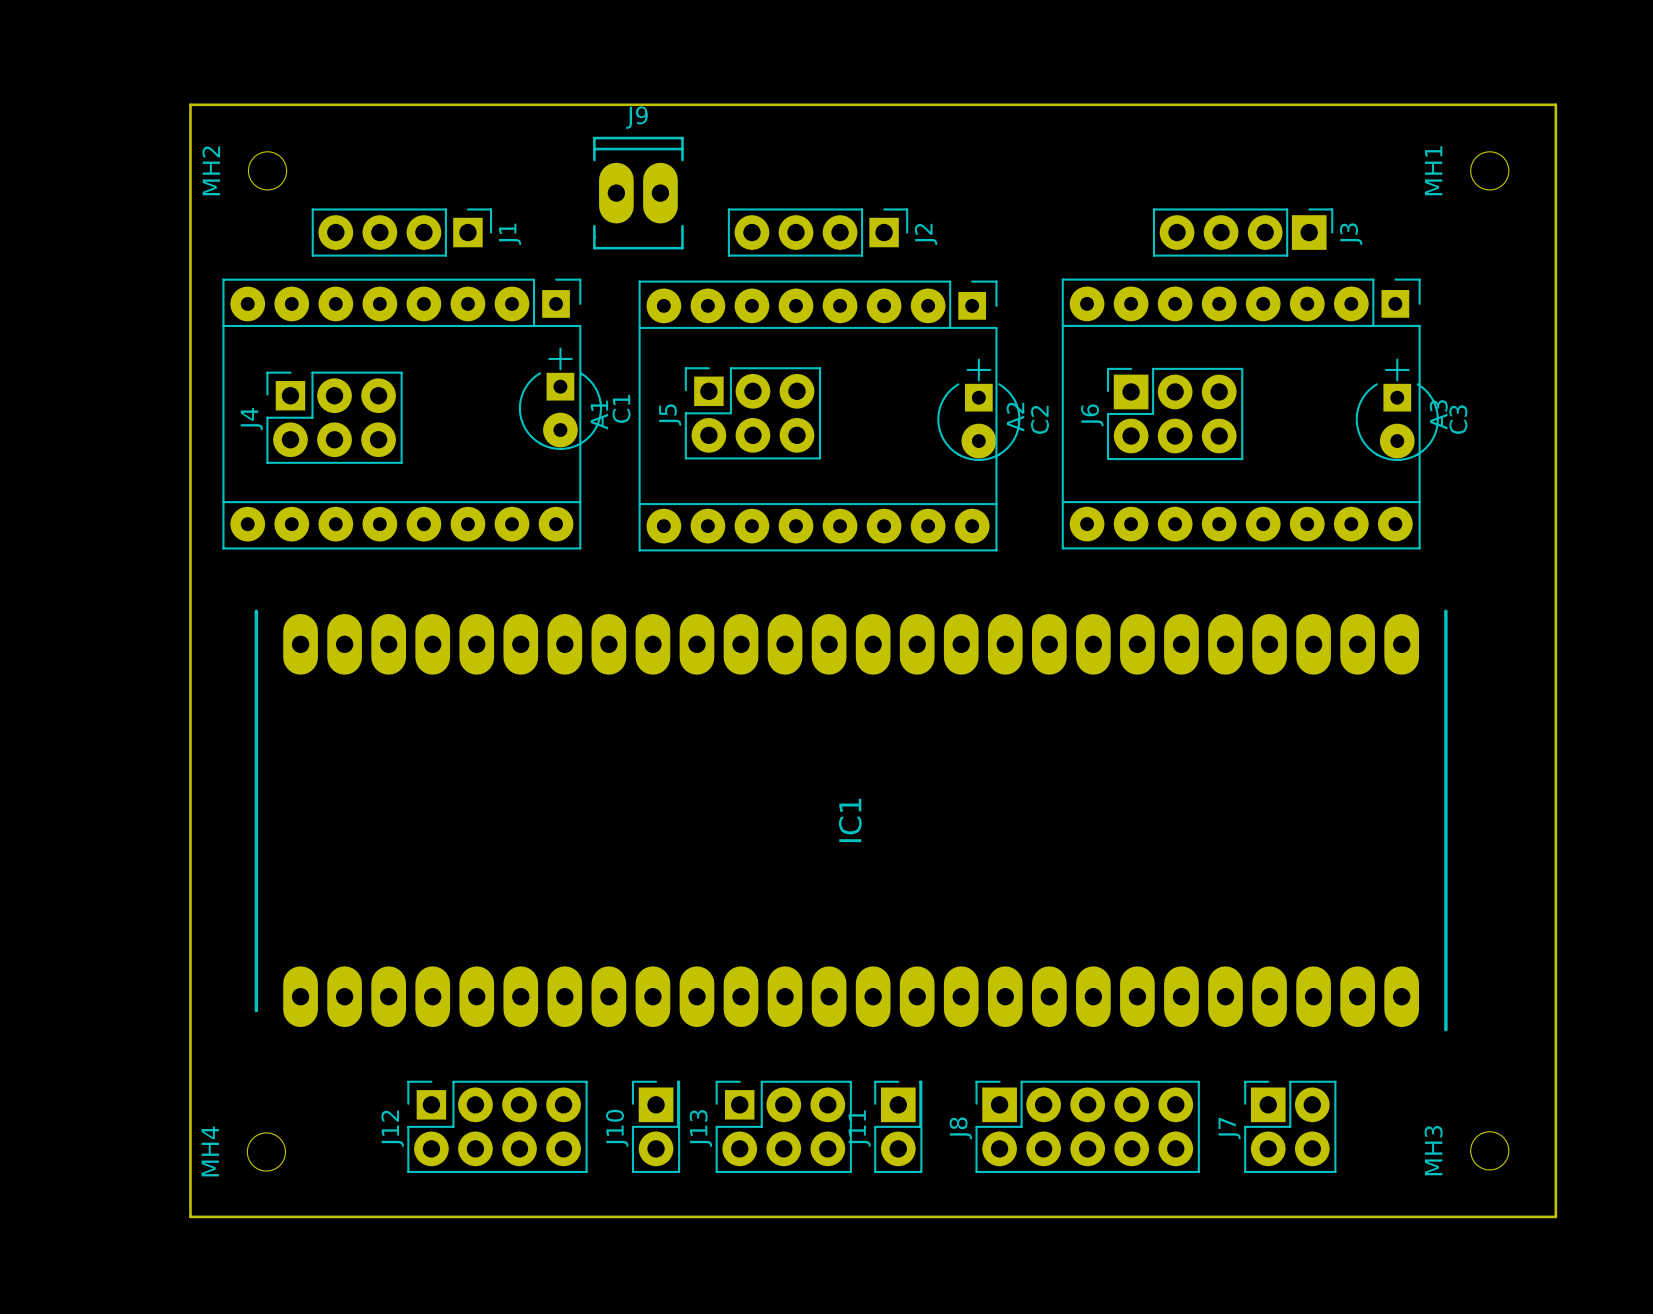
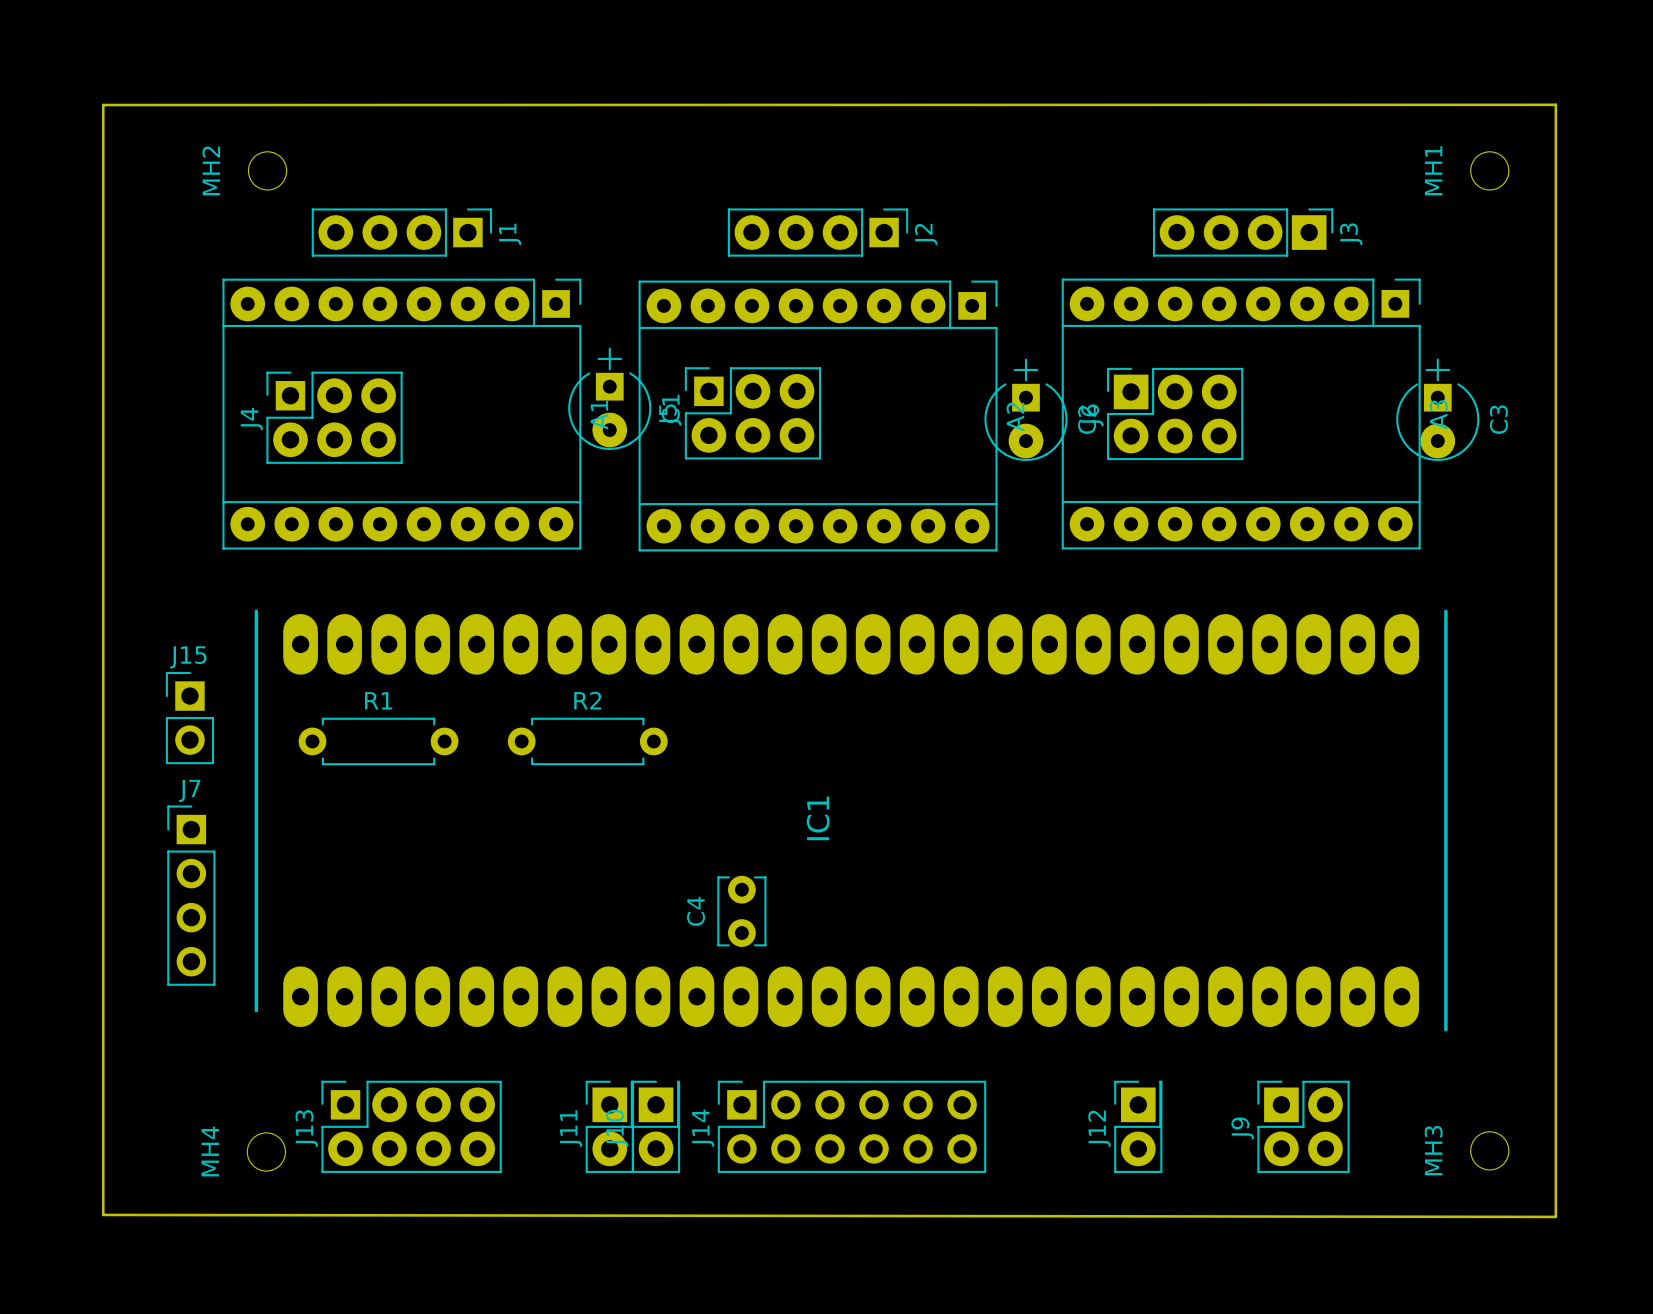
board edge: (1555, 104) (190, 104) (190, 1216) (1555, 1216) -> (1555, 104) (103, 105) (103, 1214) (1555, 1216)
J9 name position: J9 (636, 117) -> J9 (1242, 1128)
J9 footprint: [593, 136, 684, 250] -> [1257, 1080, 1350, 1173]
C1 position: (560, 398) -> (609, 398)
C2 position: (978, 409) -> (1025, 409)
C3 position: (1397, 409) -> (1437, 409)
J15: none -> (189, 718)
R1: none -> (378, 741)
R2: none -> (587, 741)
IC1 name position: IC1 (850, 820) -> IC1 (818, 818)
C4: none -> (741, 911)
J12 footprint: [407, 1080, 588, 1173] -> [1114, 1080, 1163, 1173]
J13 footprint: [715, 1080, 852, 1173] -> [321, 1080, 502, 1173]
J7 footprint: [1244, 1080, 1337, 1173] -> [167, 805, 216, 986]
J14: none -> (852, 1126)
J11 position: (898, 1126) -> (609, 1126)
J8: (1087, 1126) -> none
J12 name position: J12 (392, 1128) -> J12 (1099, 1128)
J7 name position: J7 (1229, 1128) -> J7 (189, 790)

